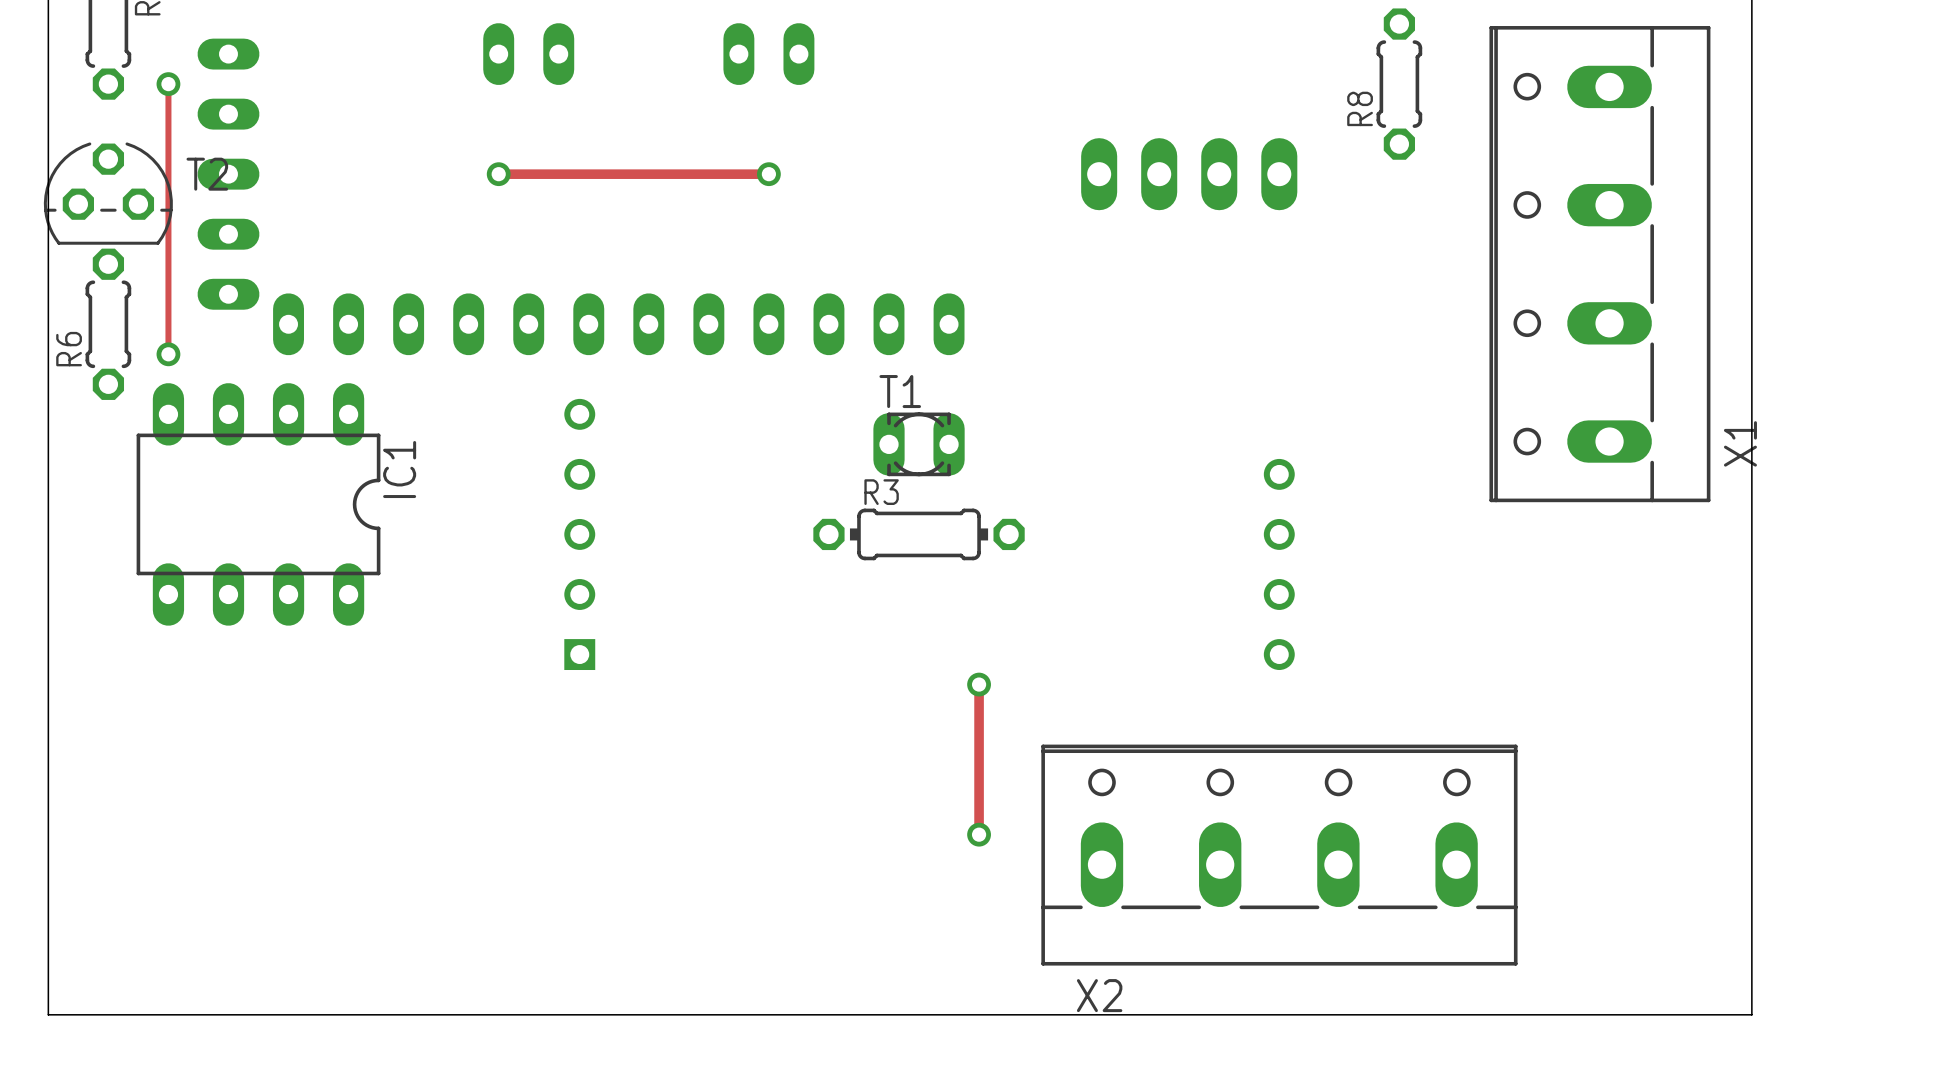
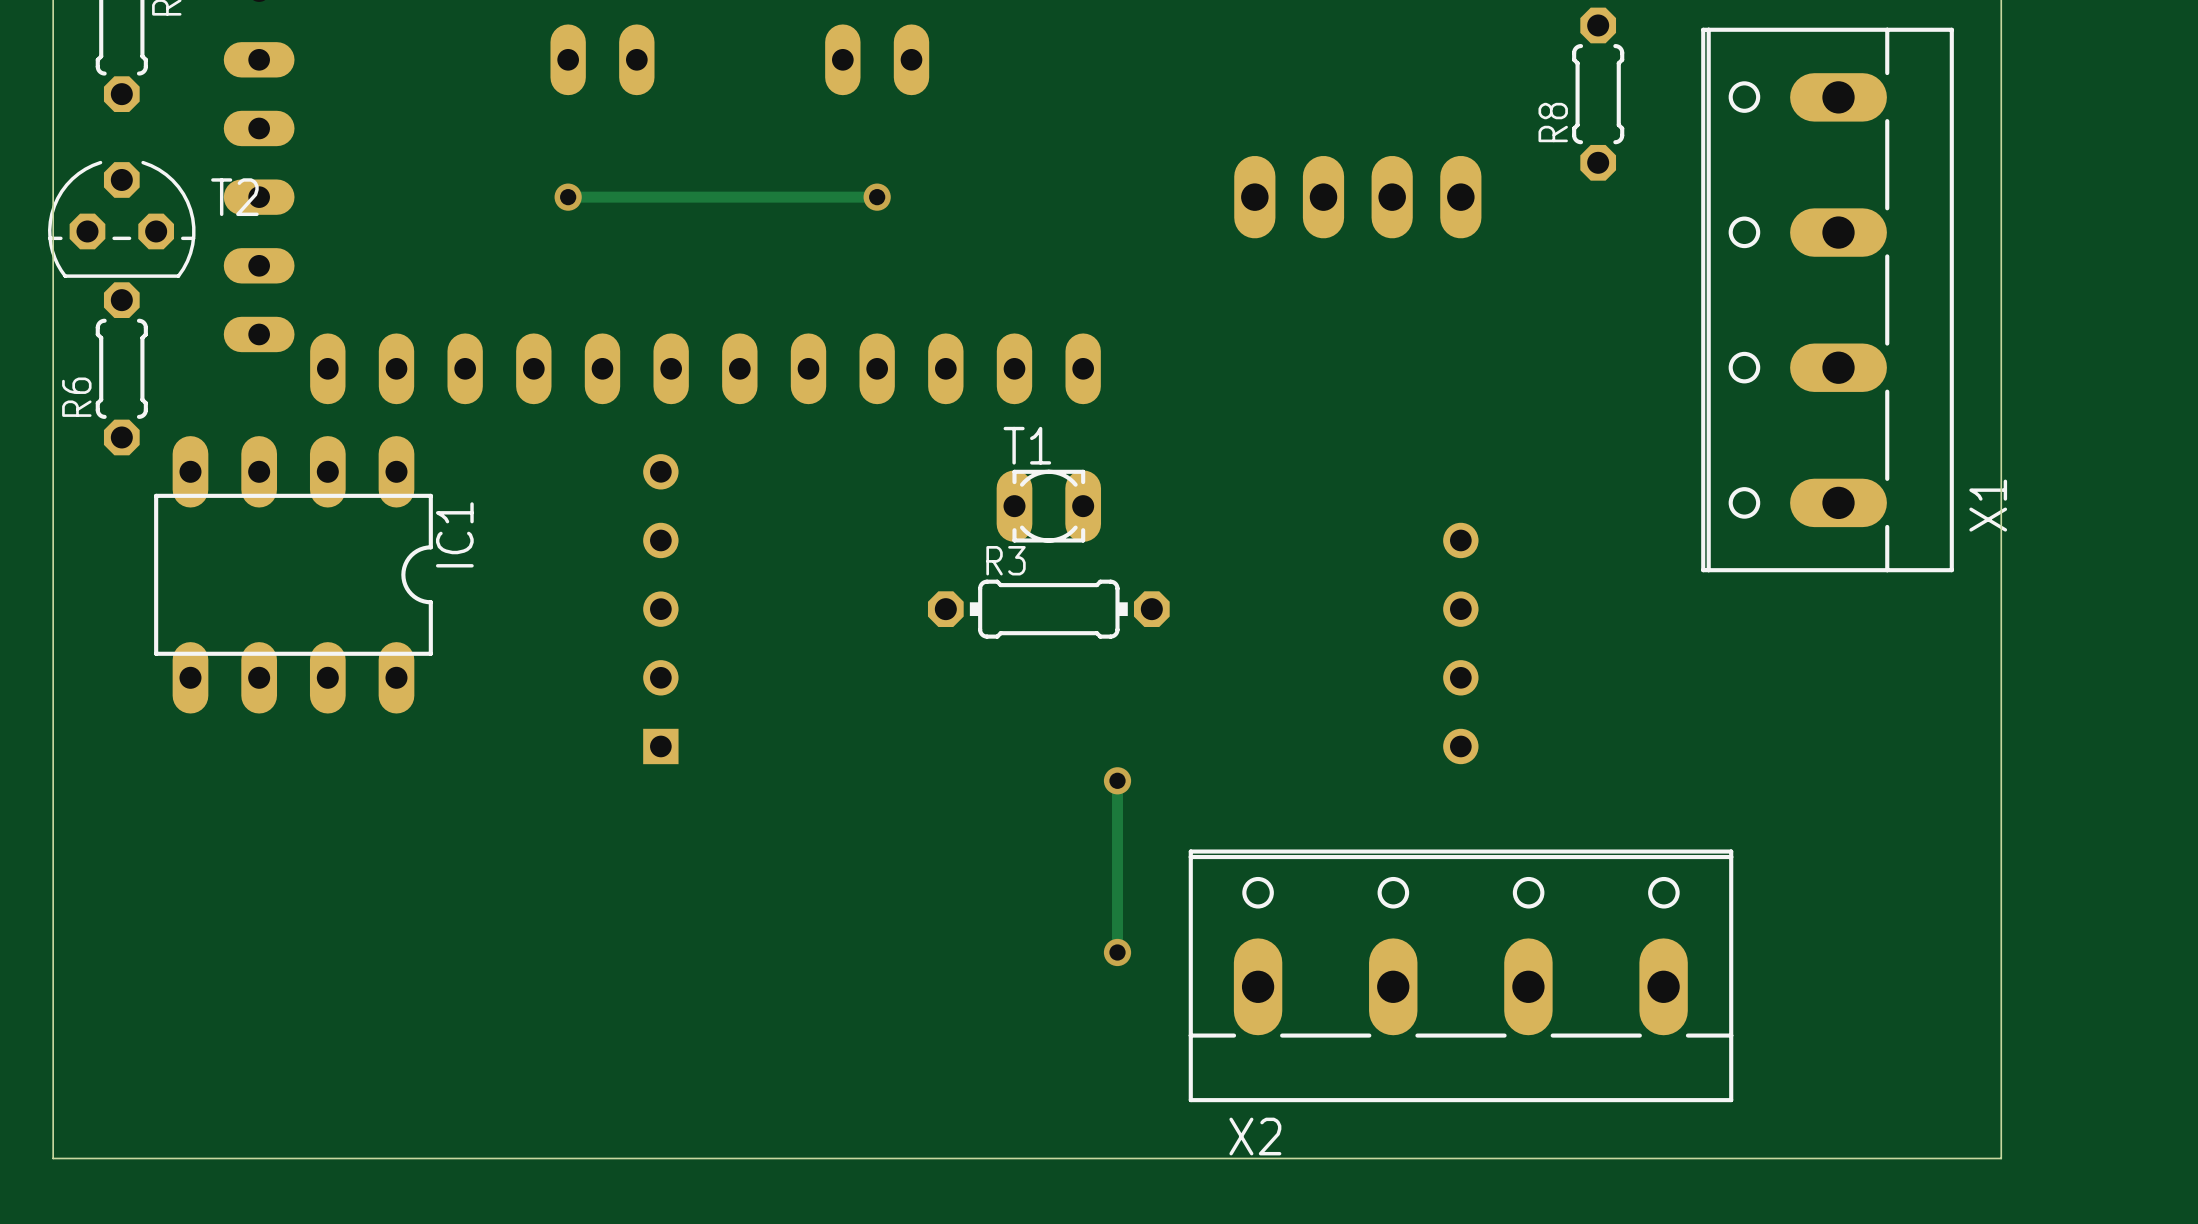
track: (168, 84) (168, 354) -> none
via: (168, 84) -> none
via: (168, 354) -> none

